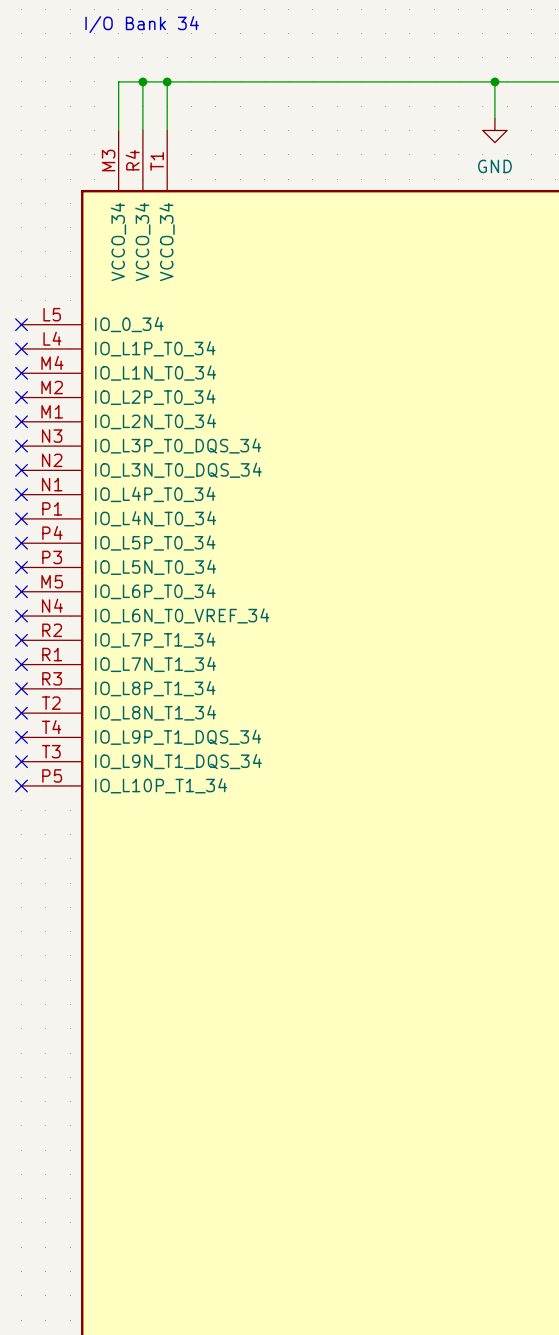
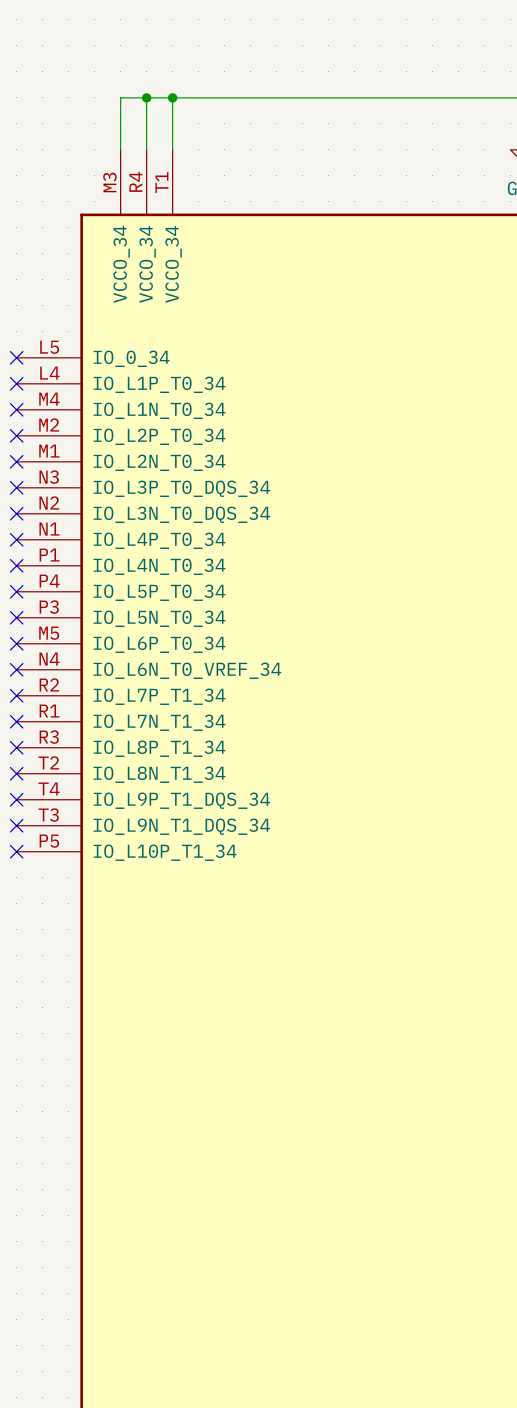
text: I/O Bank 34 (142, 24) -> none

